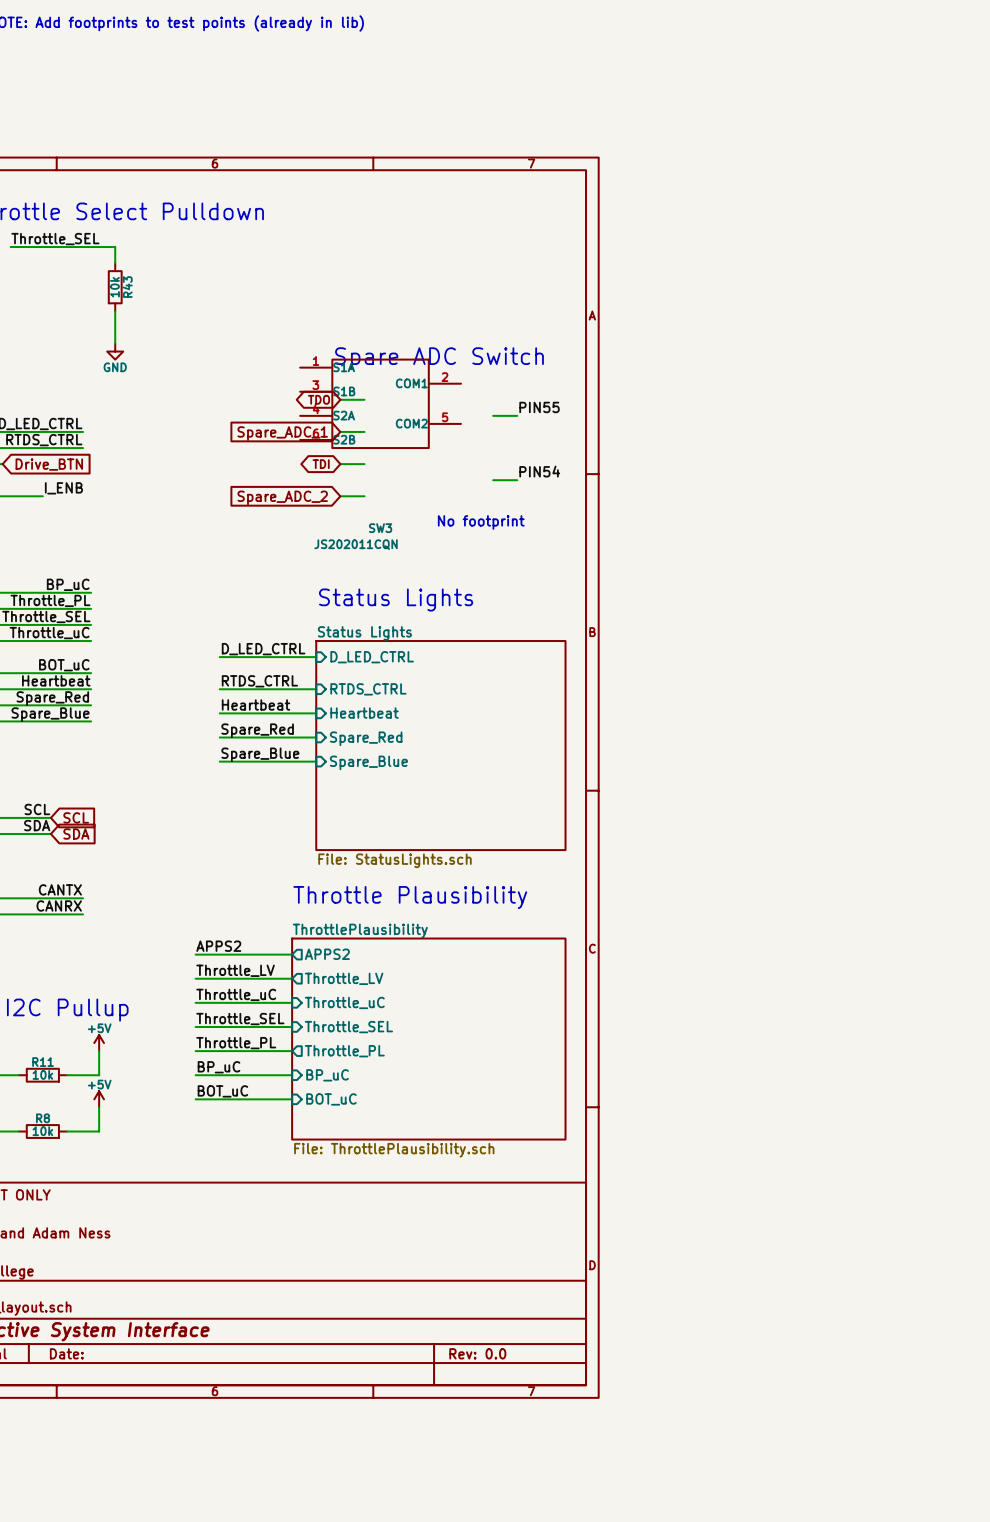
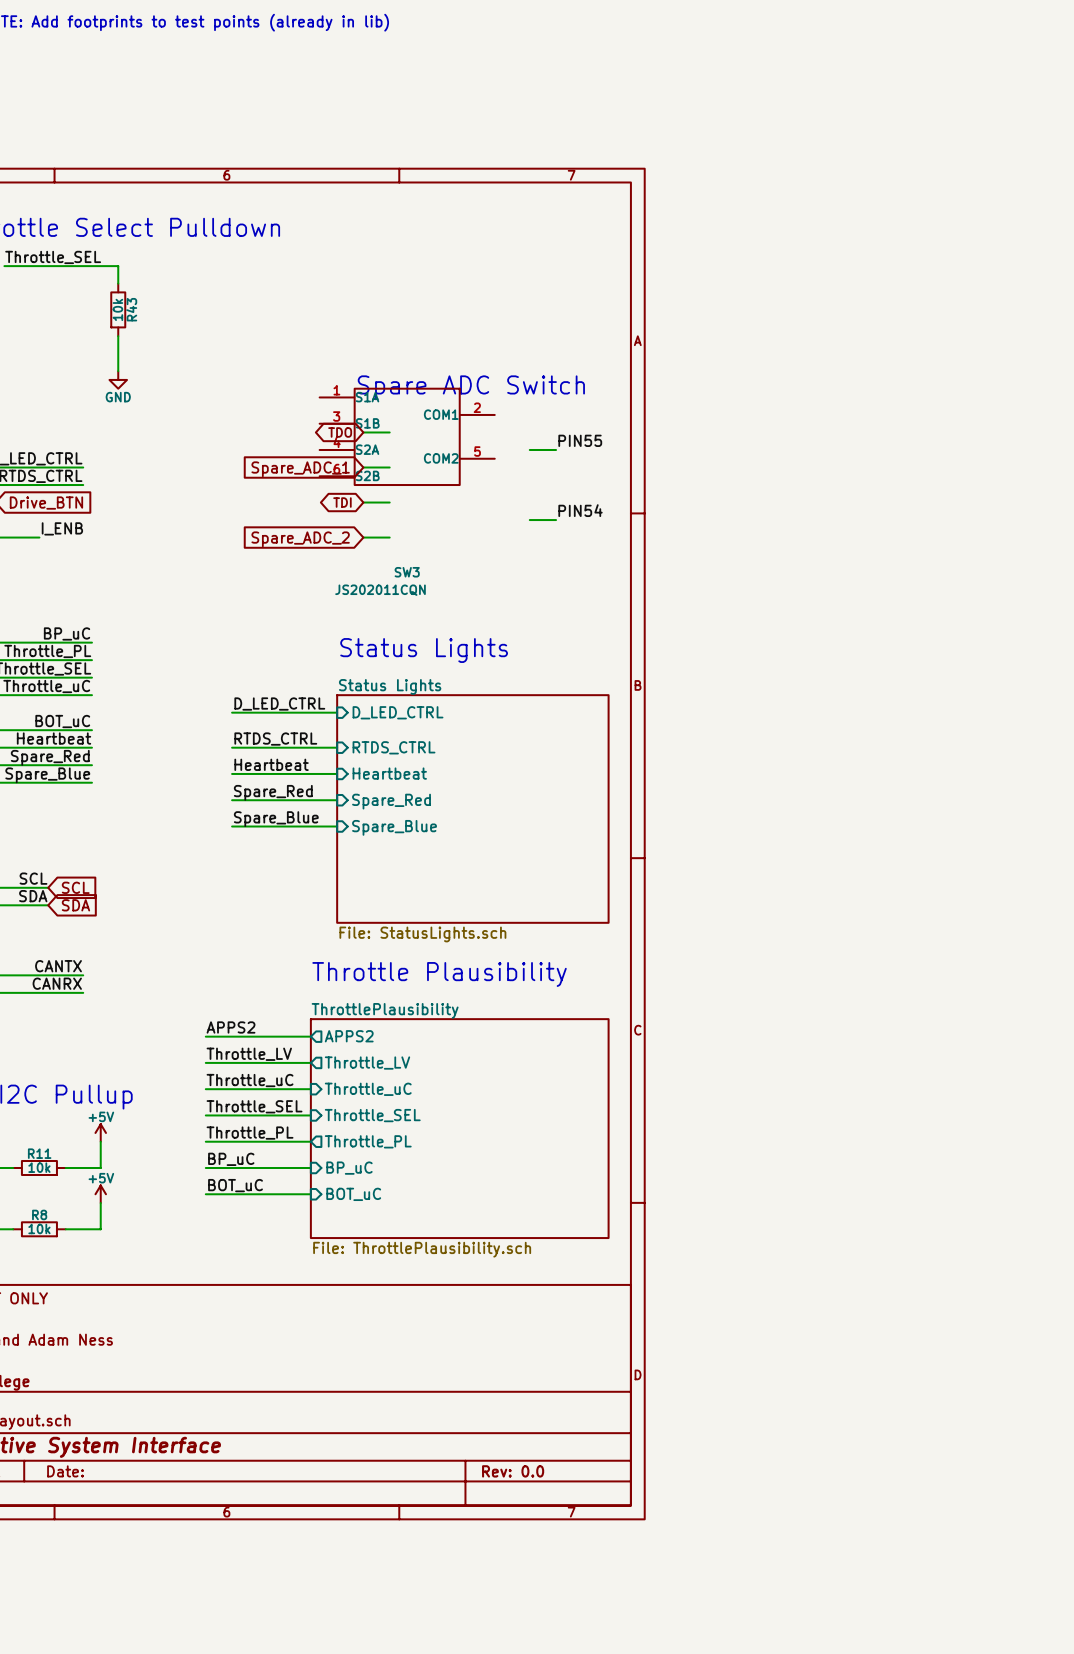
text: No footprint (481, 522) -> none

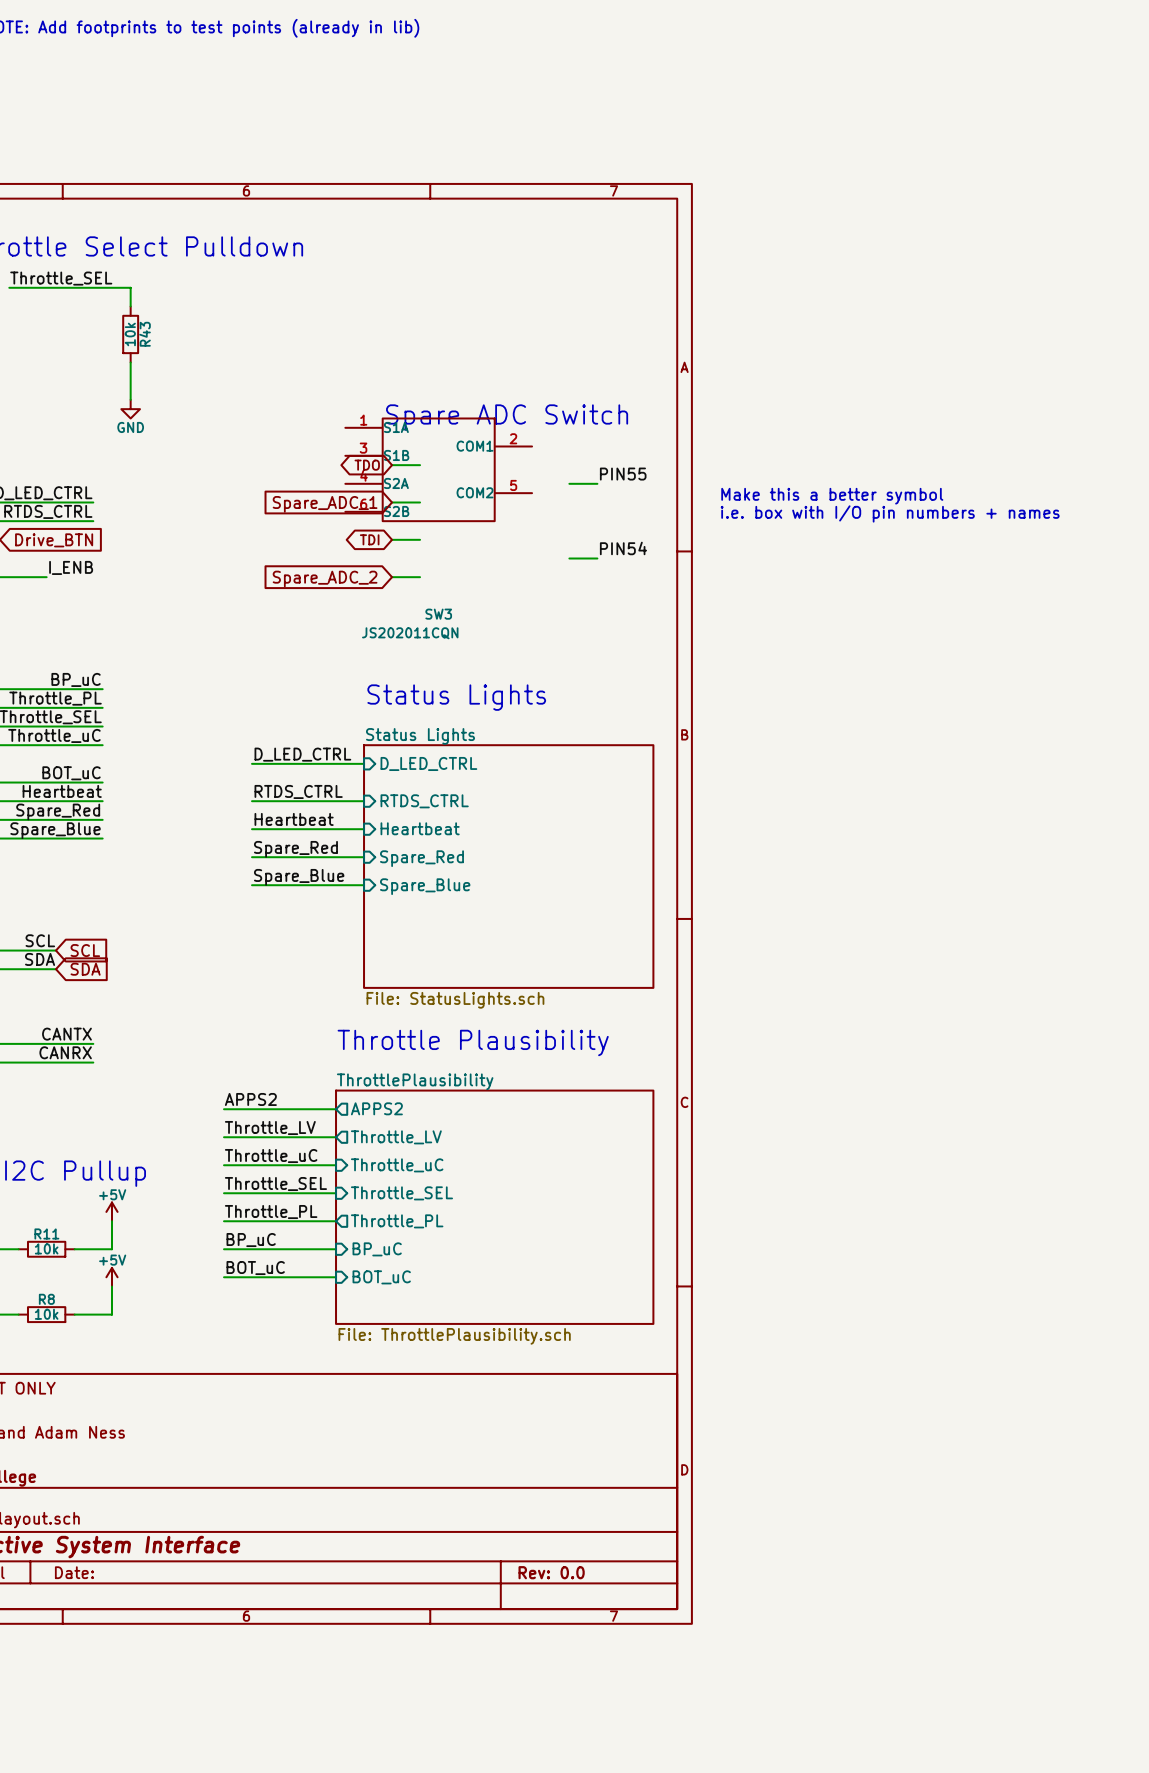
text: none -> Make this a better symbol (832, 496)
text: none -> i.e. box with I/O pin numbers + names (890, 513)

